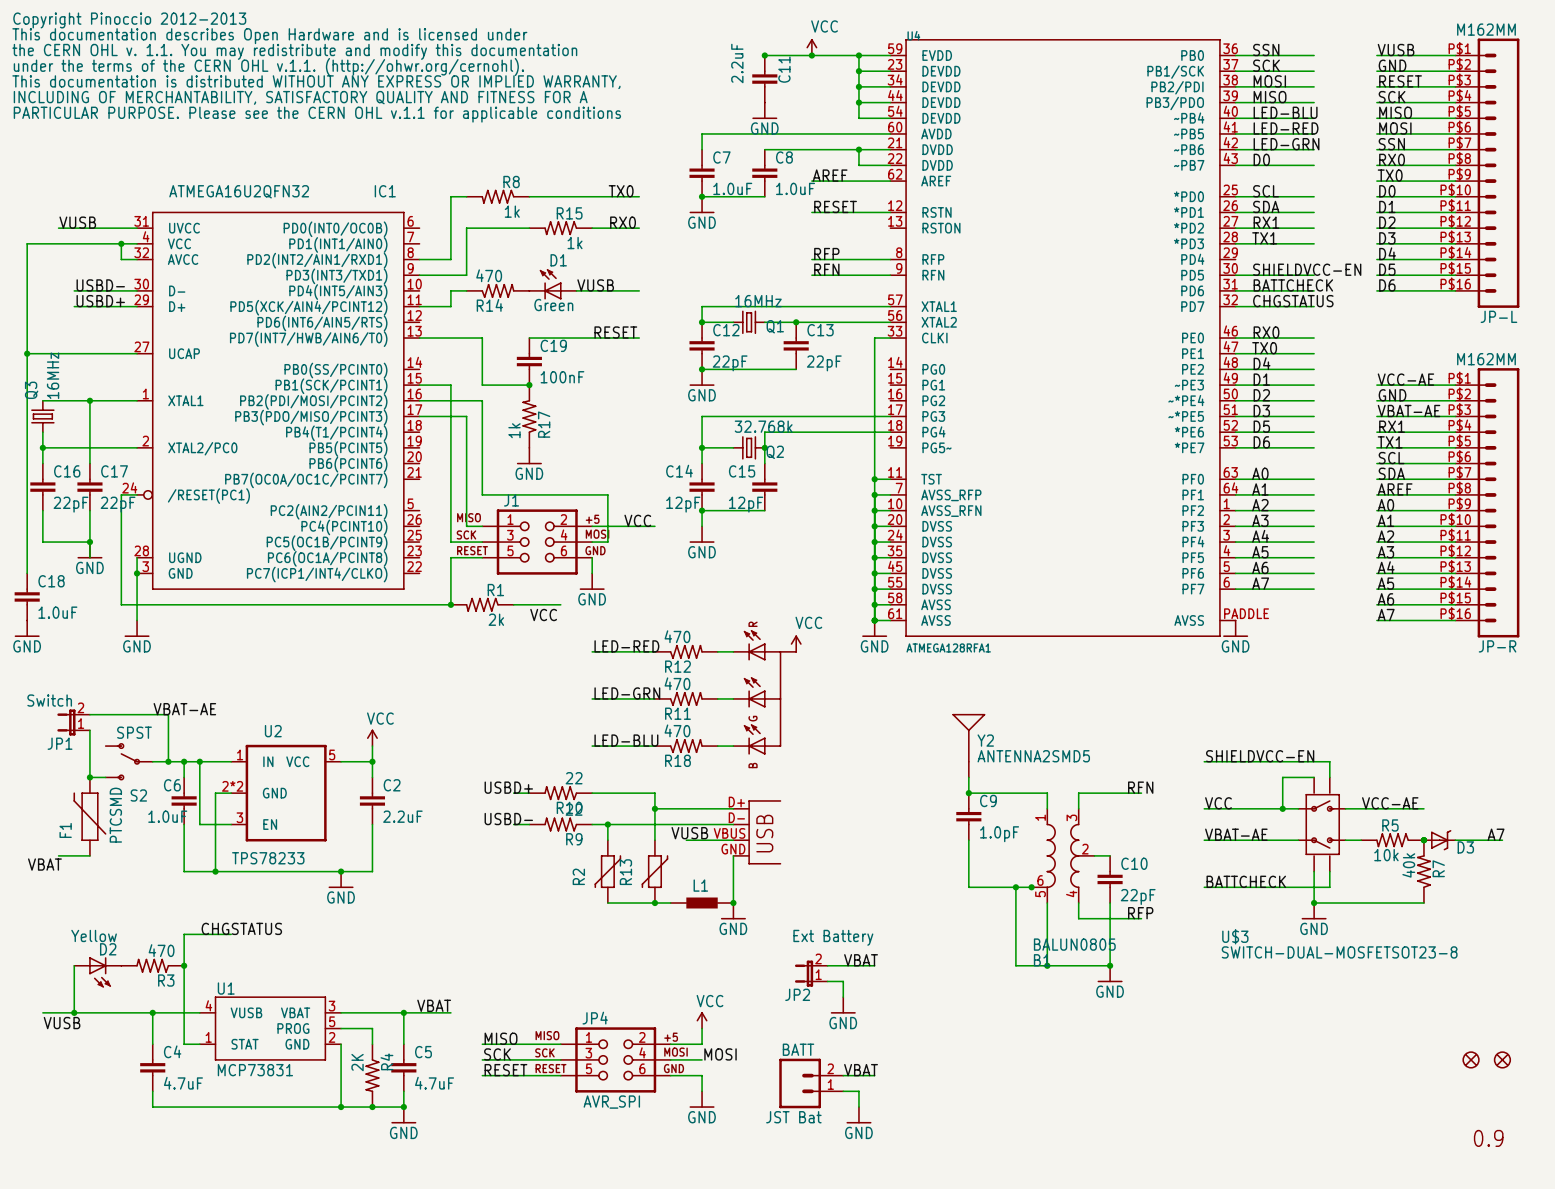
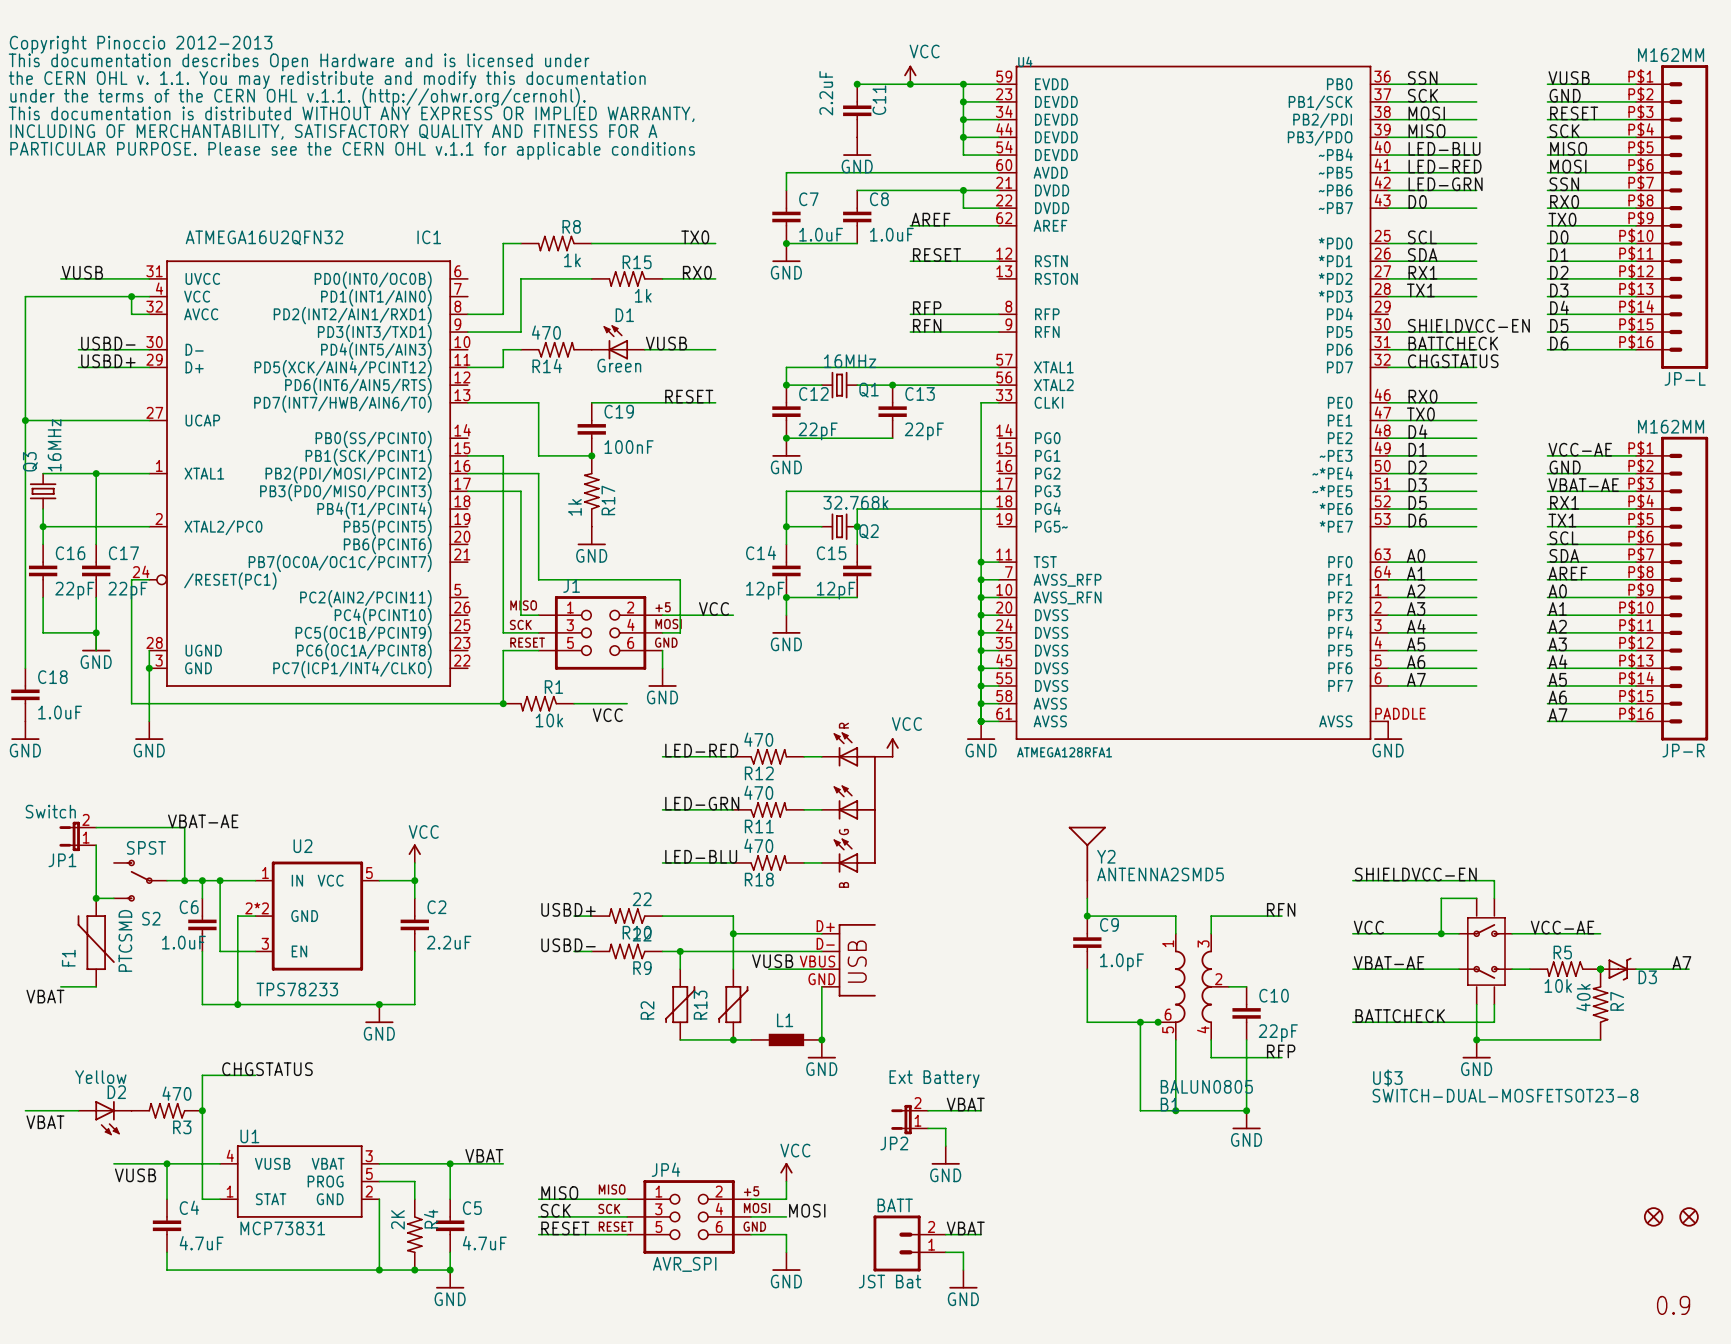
R1 value: 2k (496, 619) -> 10k (549, 720)
wire: (74, 965) (74, 1012) -> (78, 1110) (25, 1110)
label: none -> VBAT (45, 1122)
wire: (42, 1012) (105, 1012) -> none
junction: (74, 1012) -> none
label position: VUSB (62, 1023) -> VUSB (135, 1175)

